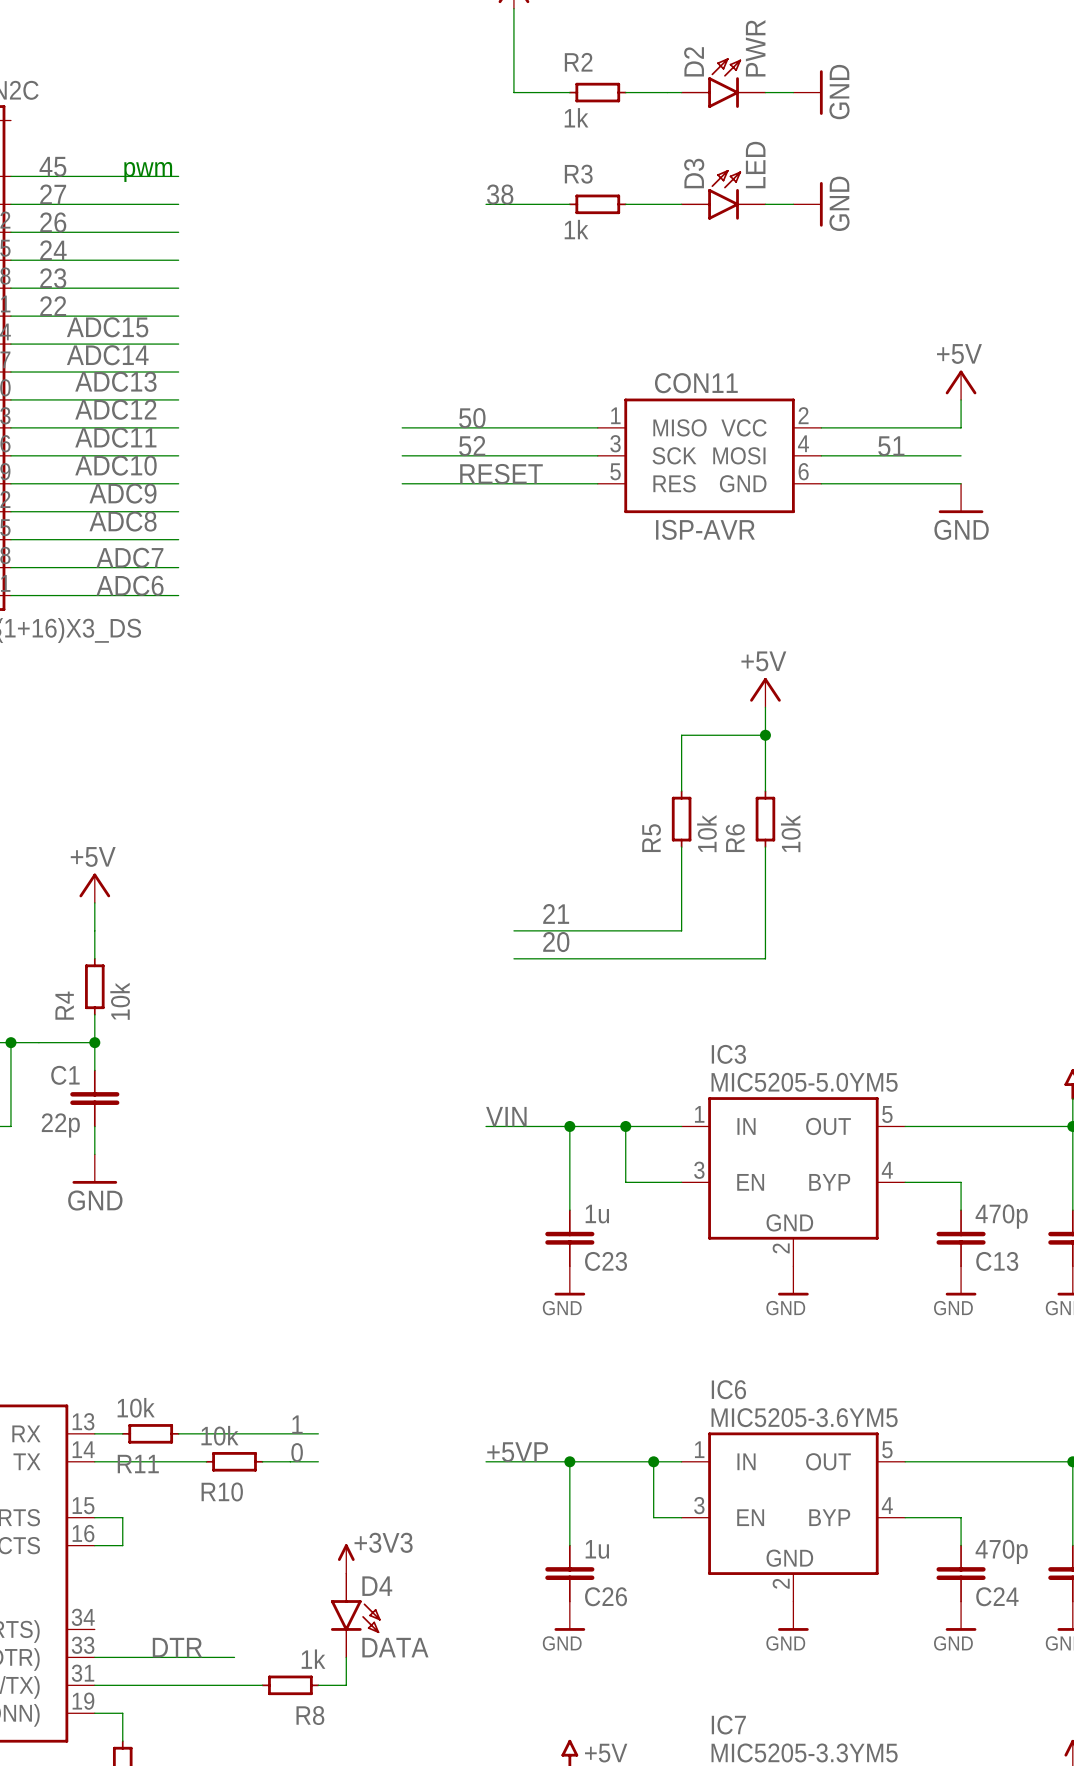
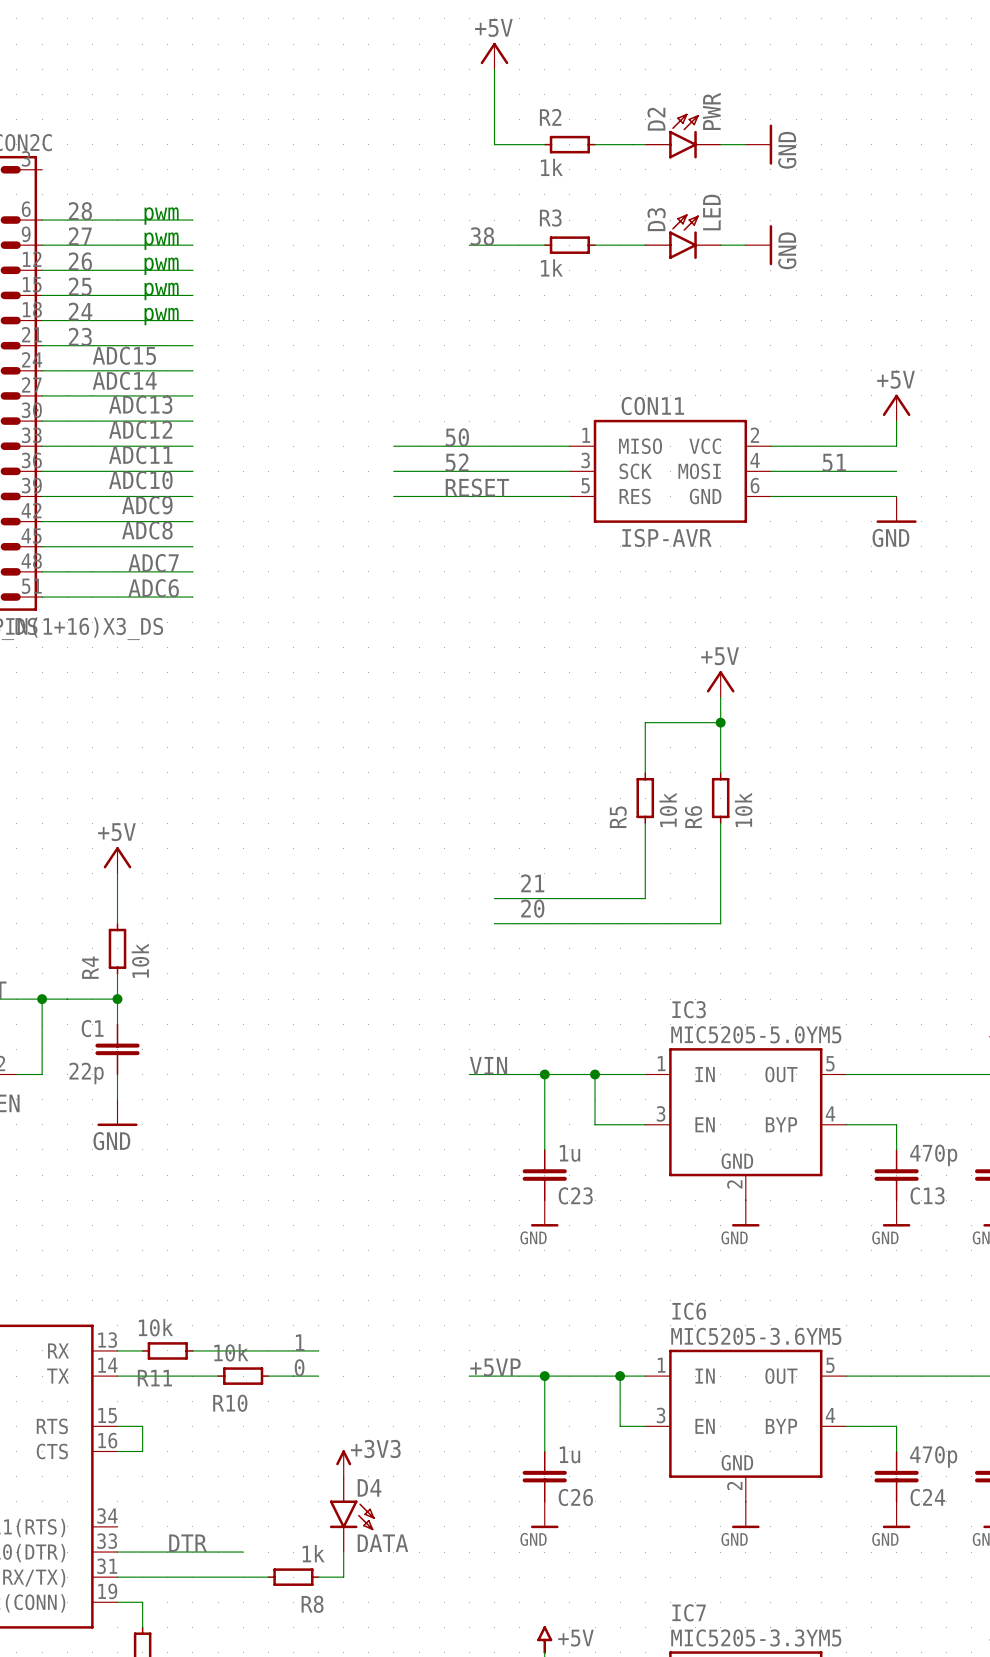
label: 45 (52, 166) -> 28 (80, 211)
text: none -> pwm (161, 241)
text: none -> pwm (161, 266)
label: 24 (53, 250) -> 25 (80, 286)
text: none -> pwm (161, 291)
label: 23 (53, 278) -> 24 (80, 311)
text: none -> pwm (161, 316)
label: 22 (53, 306) -> 23 (80, 336)

